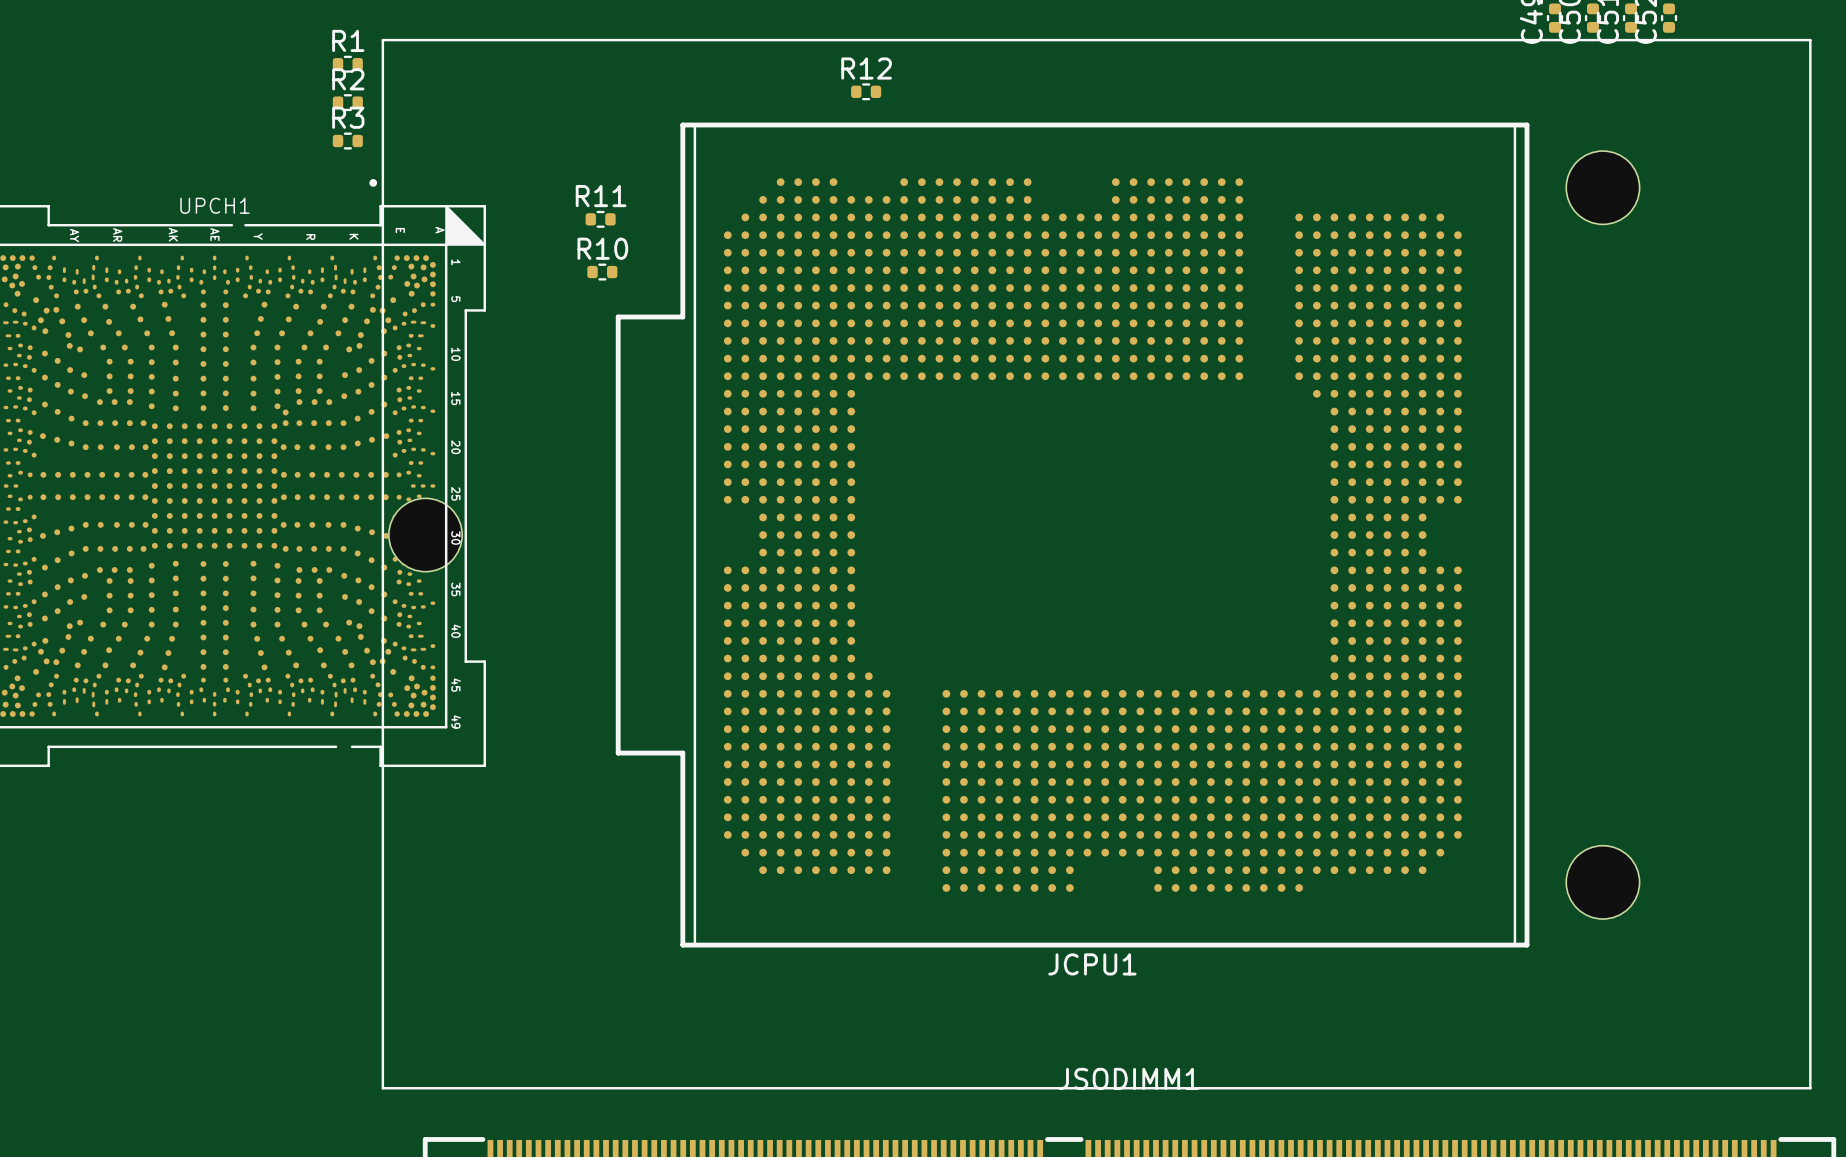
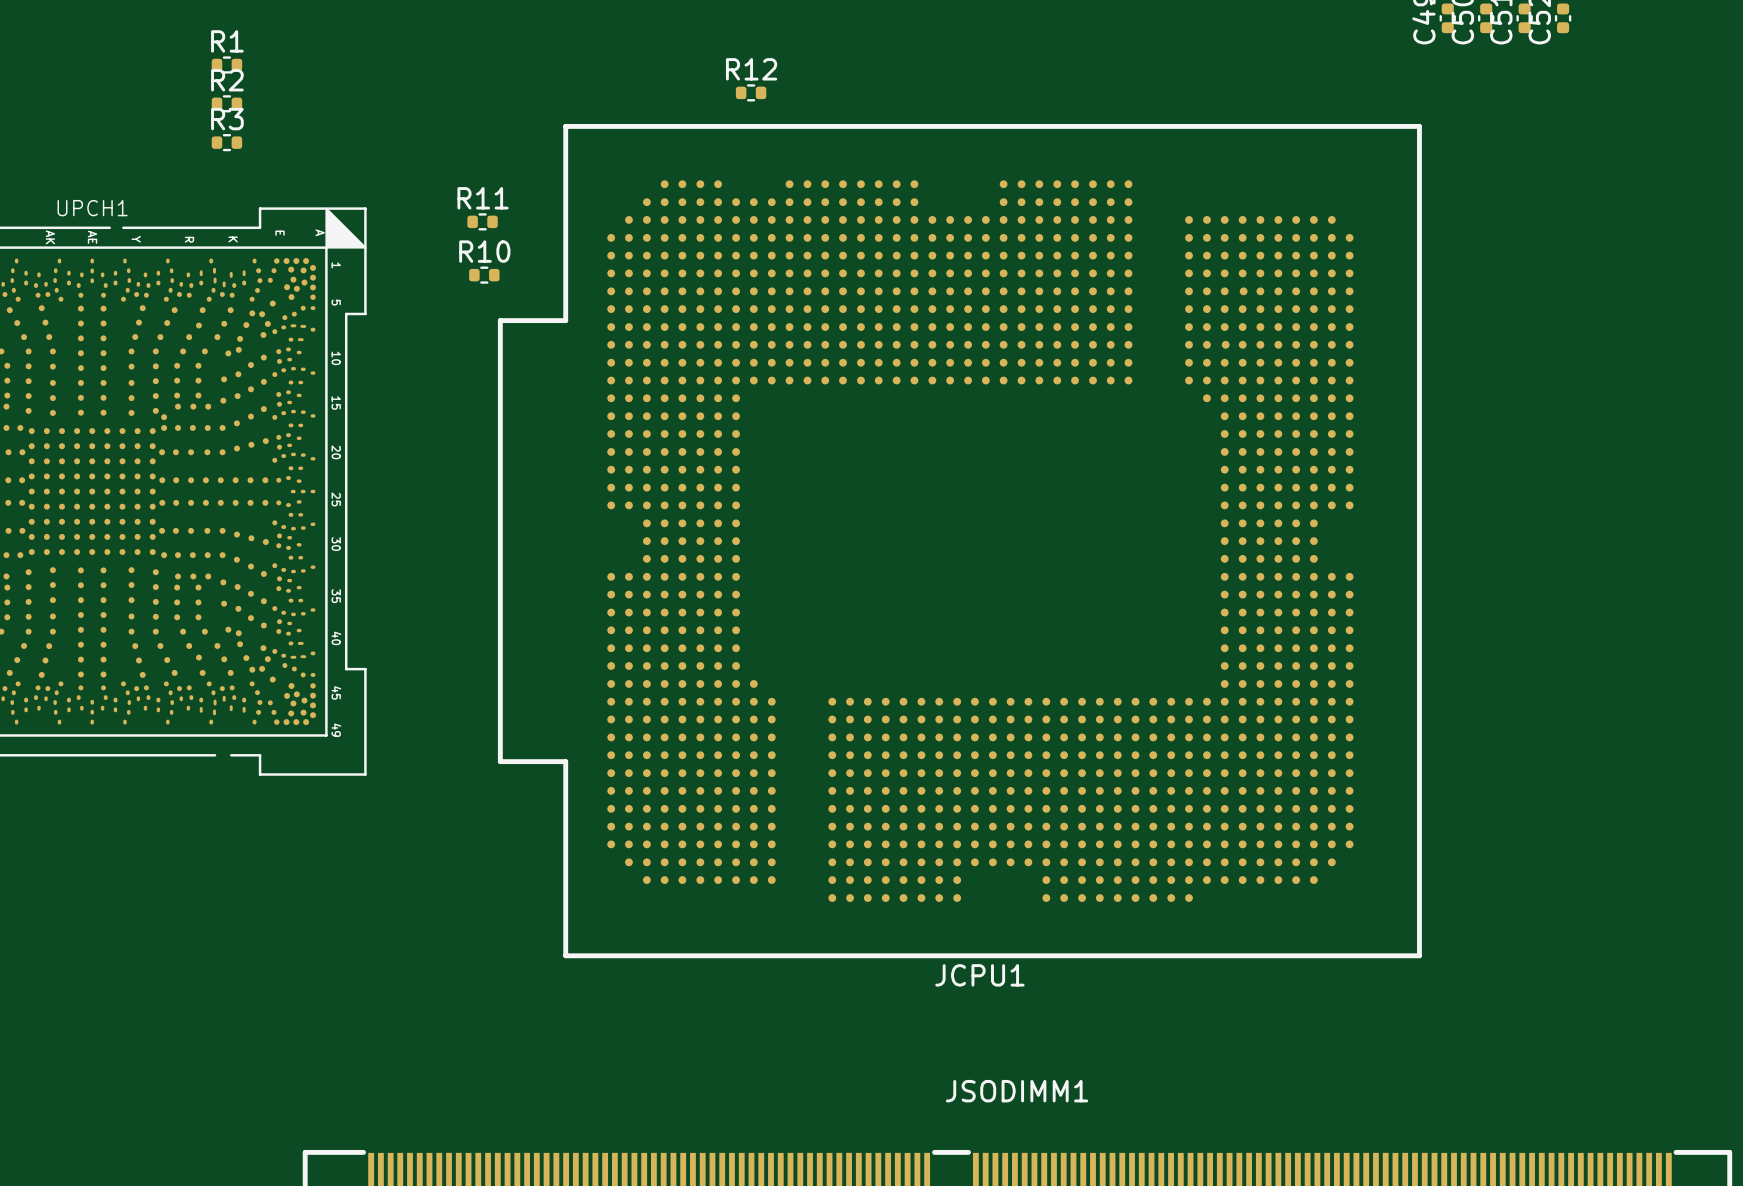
JCPU1 footprint: [369, 38, 1812, 1090] -> [497, 124, 1422, 959]

